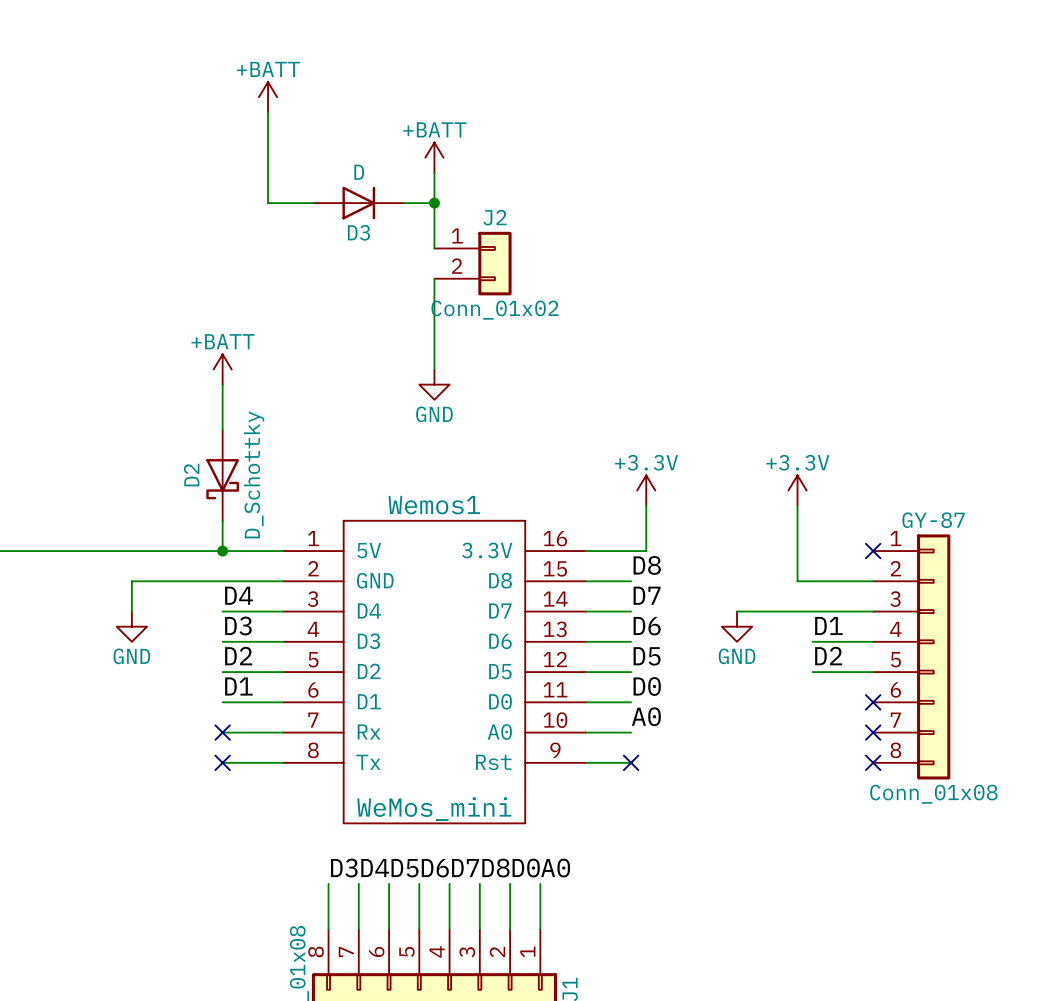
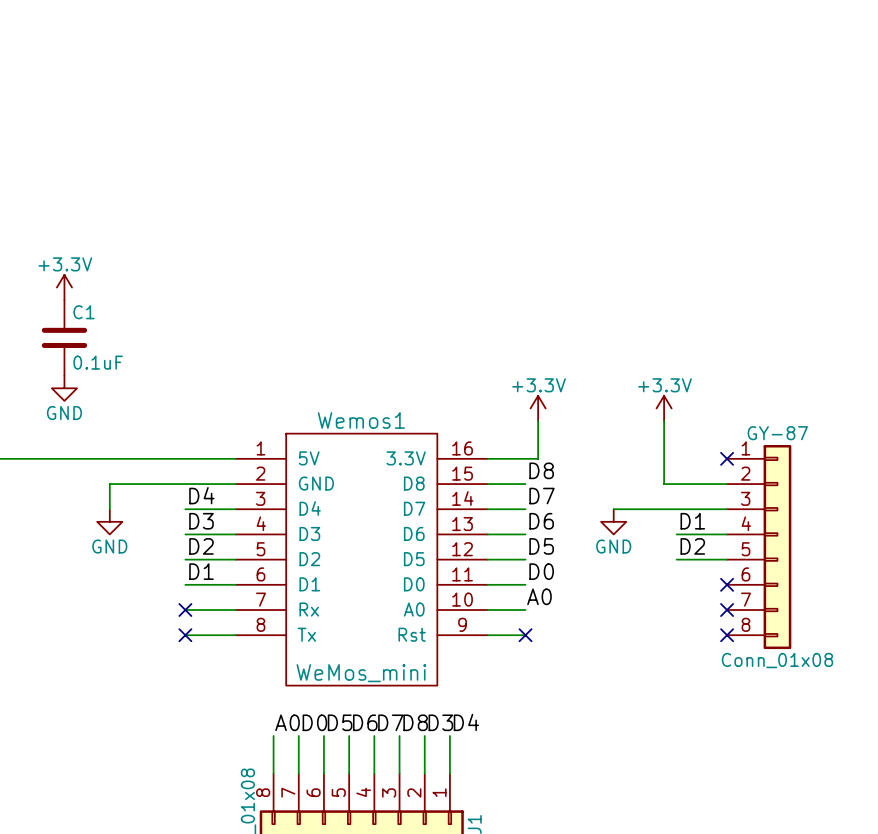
power symbol: +BATT (268, 97) -> none
wire: (268, 112) (268, 203) (313, 203) -> none
power symbol: +BATT (434, 157) -> none
wire: (434, 172) (434, 248) -> none
D3: D (358, 203) -> none
wire: (404, 203) (434, 203) -> none
junction: (434, 203) -> none
J2: Conn_01x02 (473, 263) -> none
wire: (434, 278) (434, 369) -> none
power symbol: none -> +3.3V (64, 287)
power symbol: +BATT (222, 369) -> none
wire: (222, 384) (222, 430) -> none
power symbol: GND (434, 384) -> none
C1: none -> 0.1uF (64, 337)
power symbol: none -> GND (64, 388)
D2: D_Schottky (222, 475) -> none
wire: (222, 520) (222, 551) -> none
junction: (222, 551) -> none
label: D3 (344, 868) -> A0 (287, 722)
label: D4 (375, 868) -> D0 (314, 722)
label: D0 (526, 868) -> D3 (440, 722)
label: A0 (555, 868) -> D4 (466, 722)

